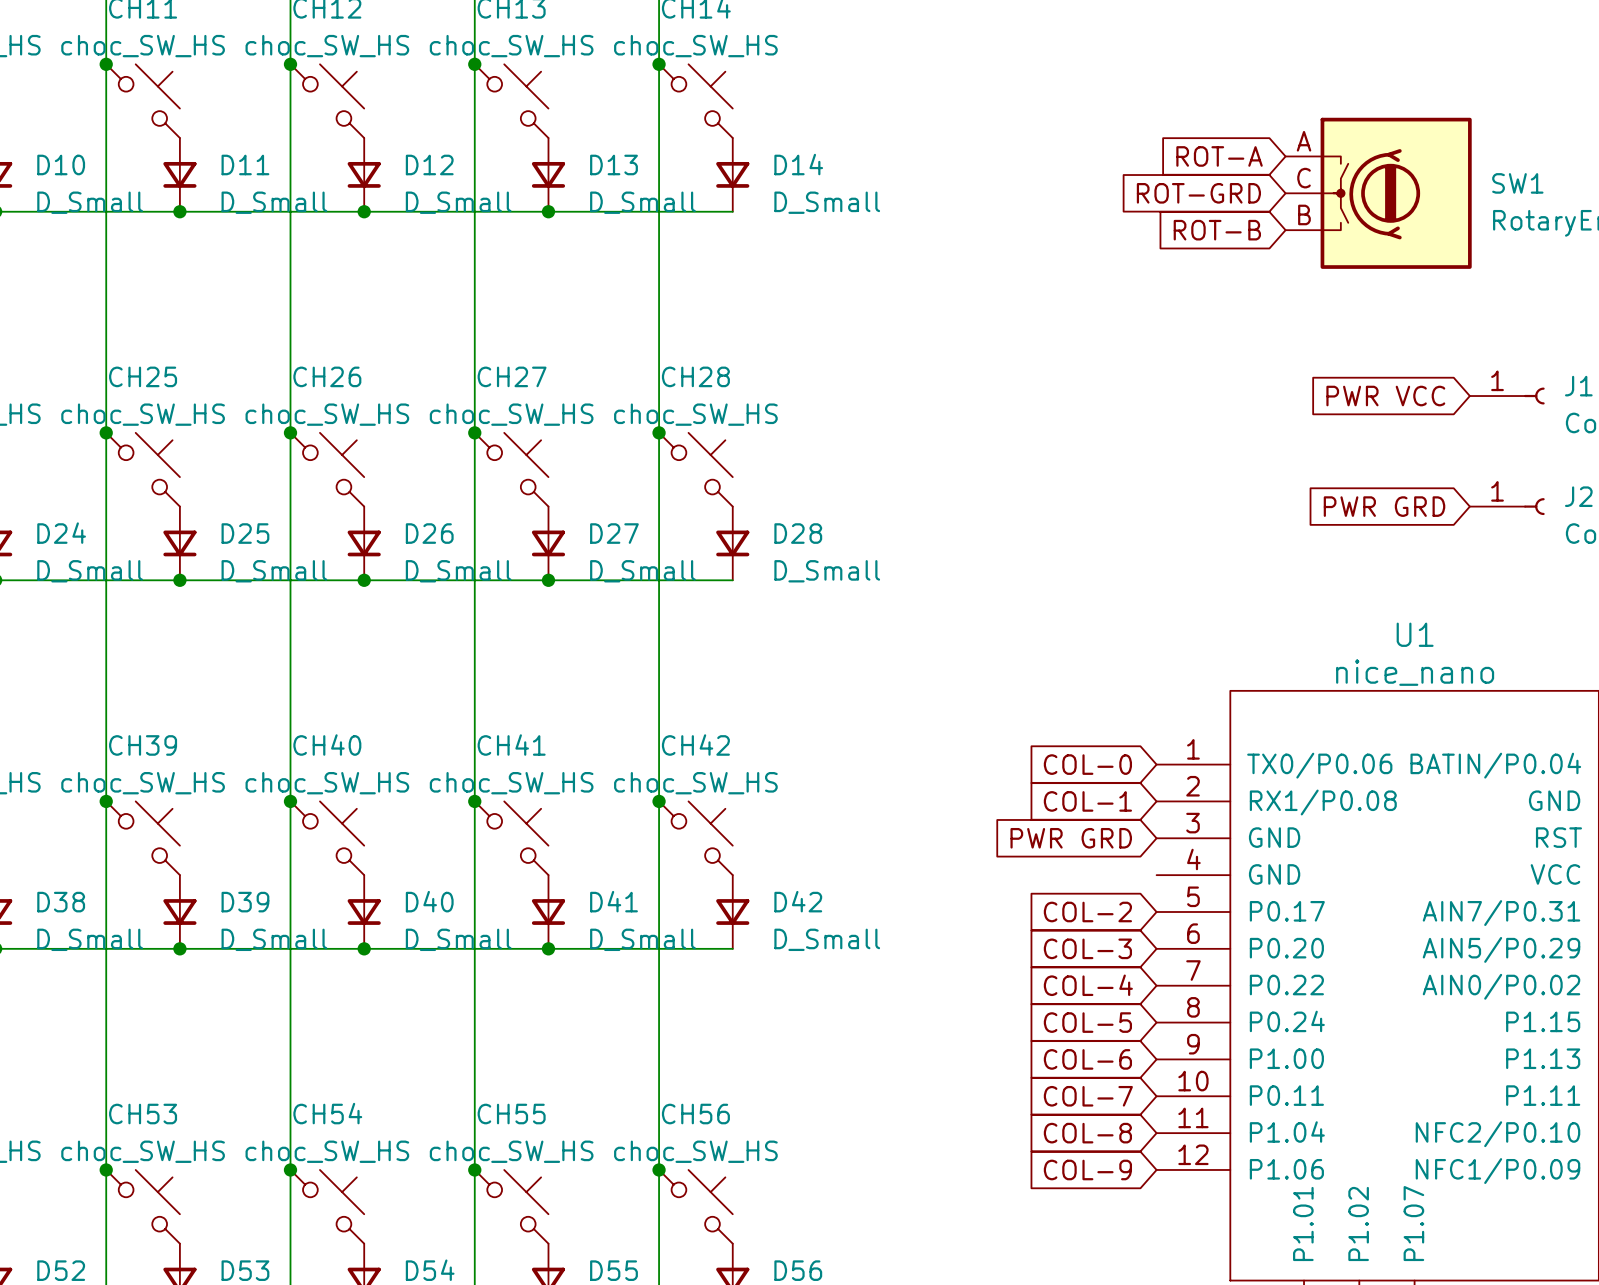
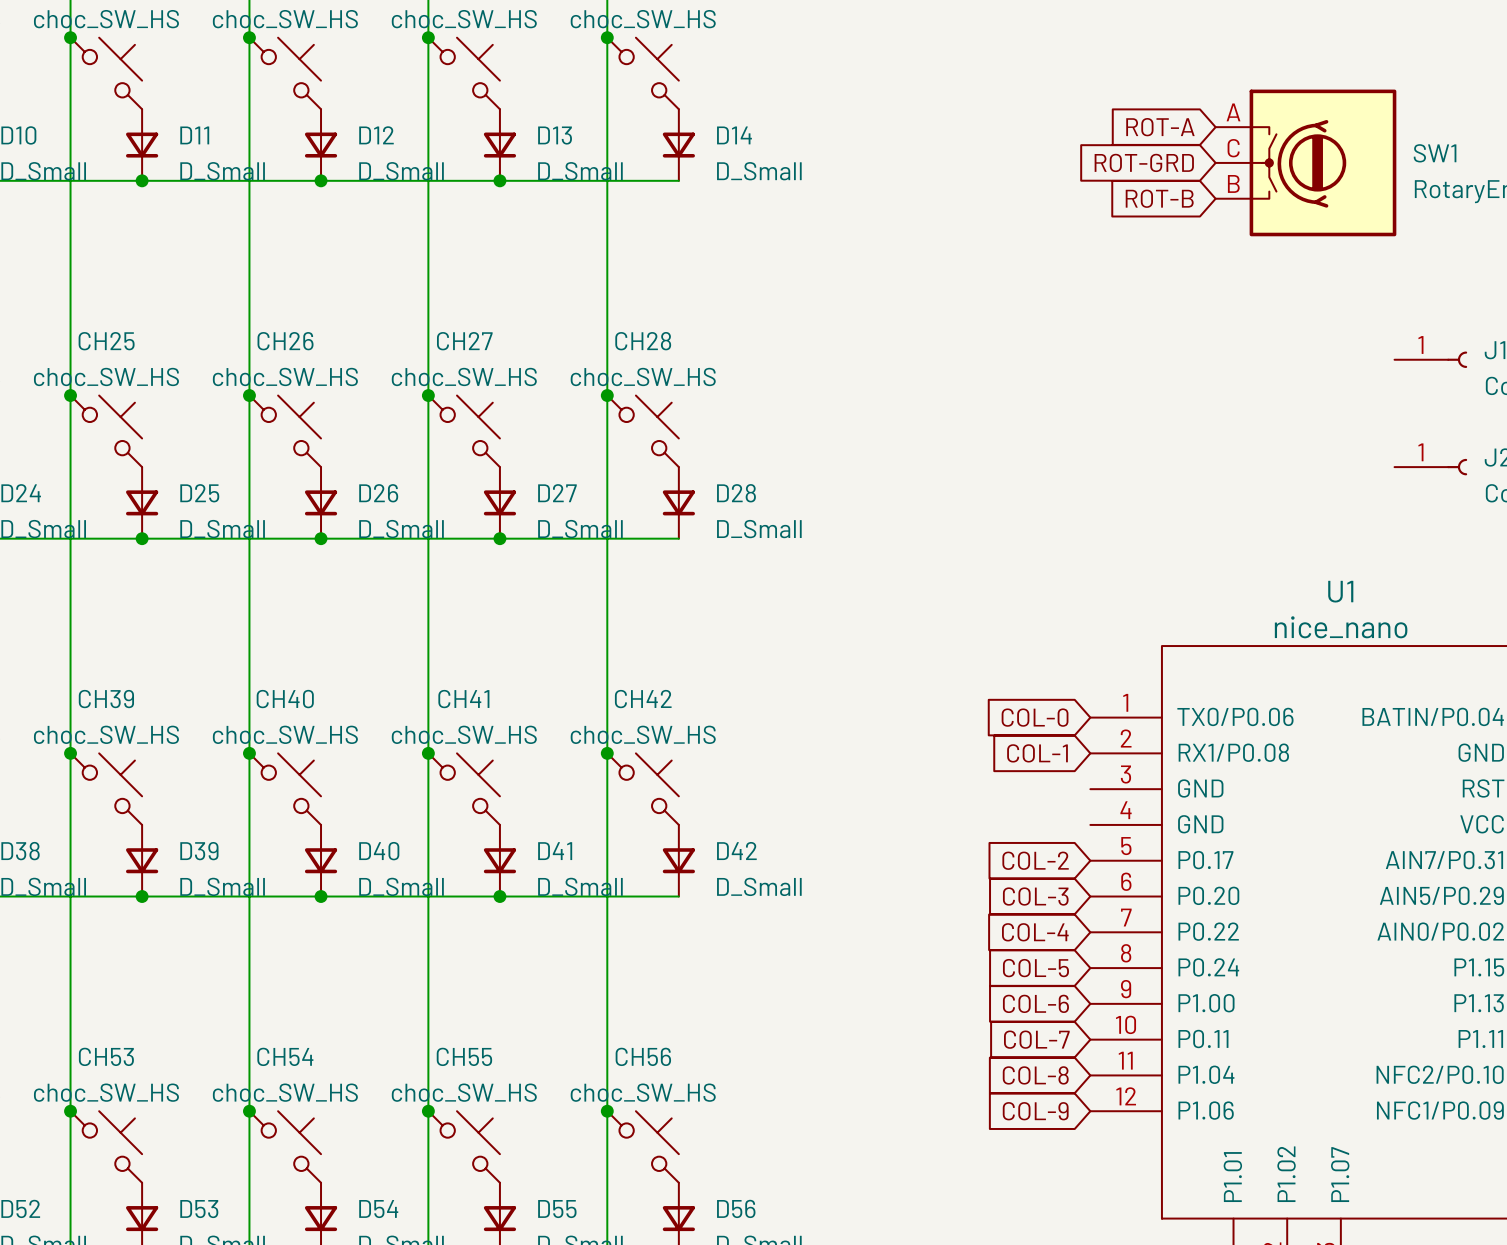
global label: PWR VCC (1385, 396) -> none
global label: PWR GRD (1384, 506) -> none
global label: PWR GRD (1071, 838) -> none

